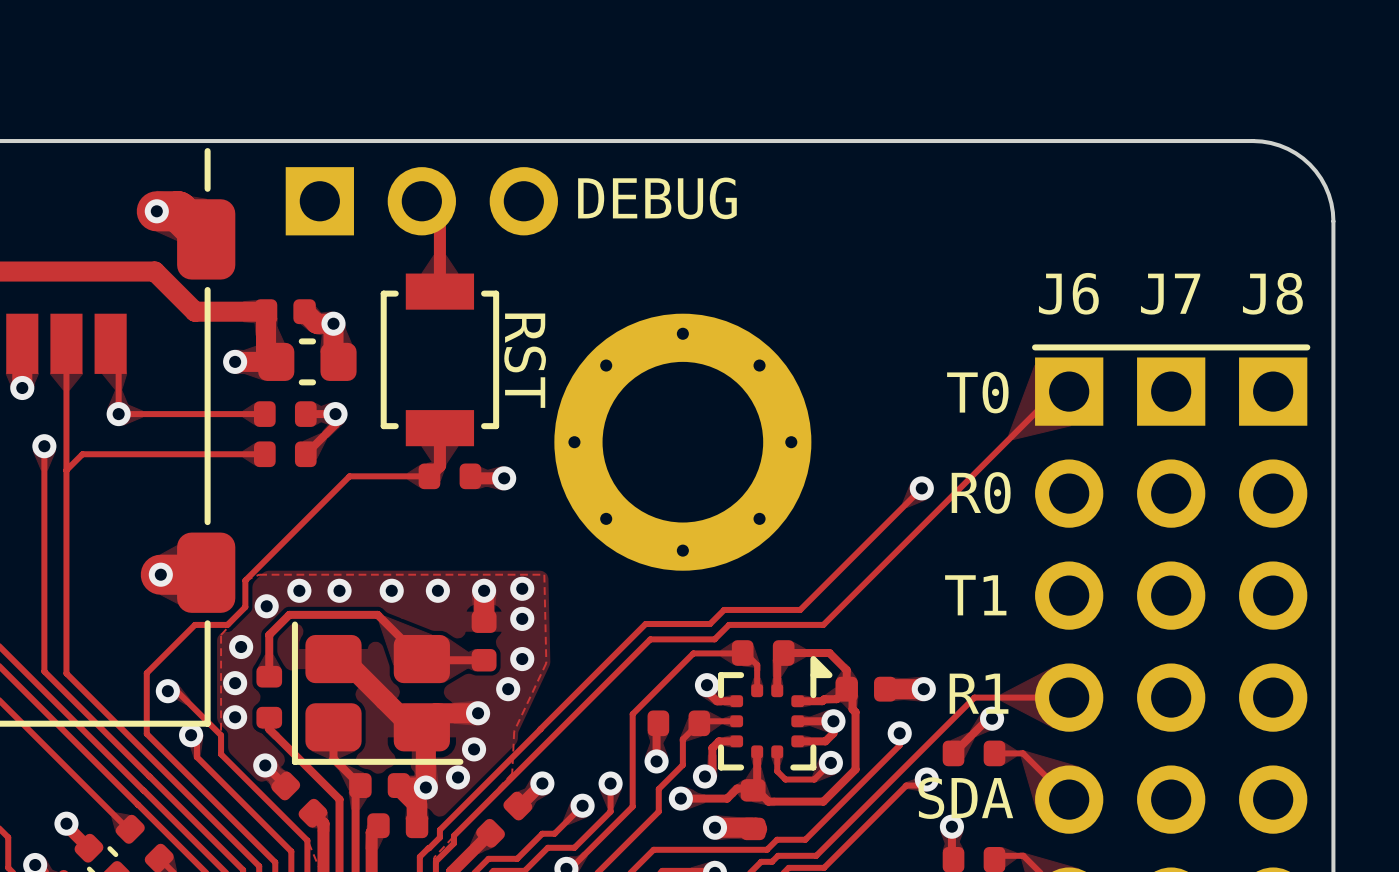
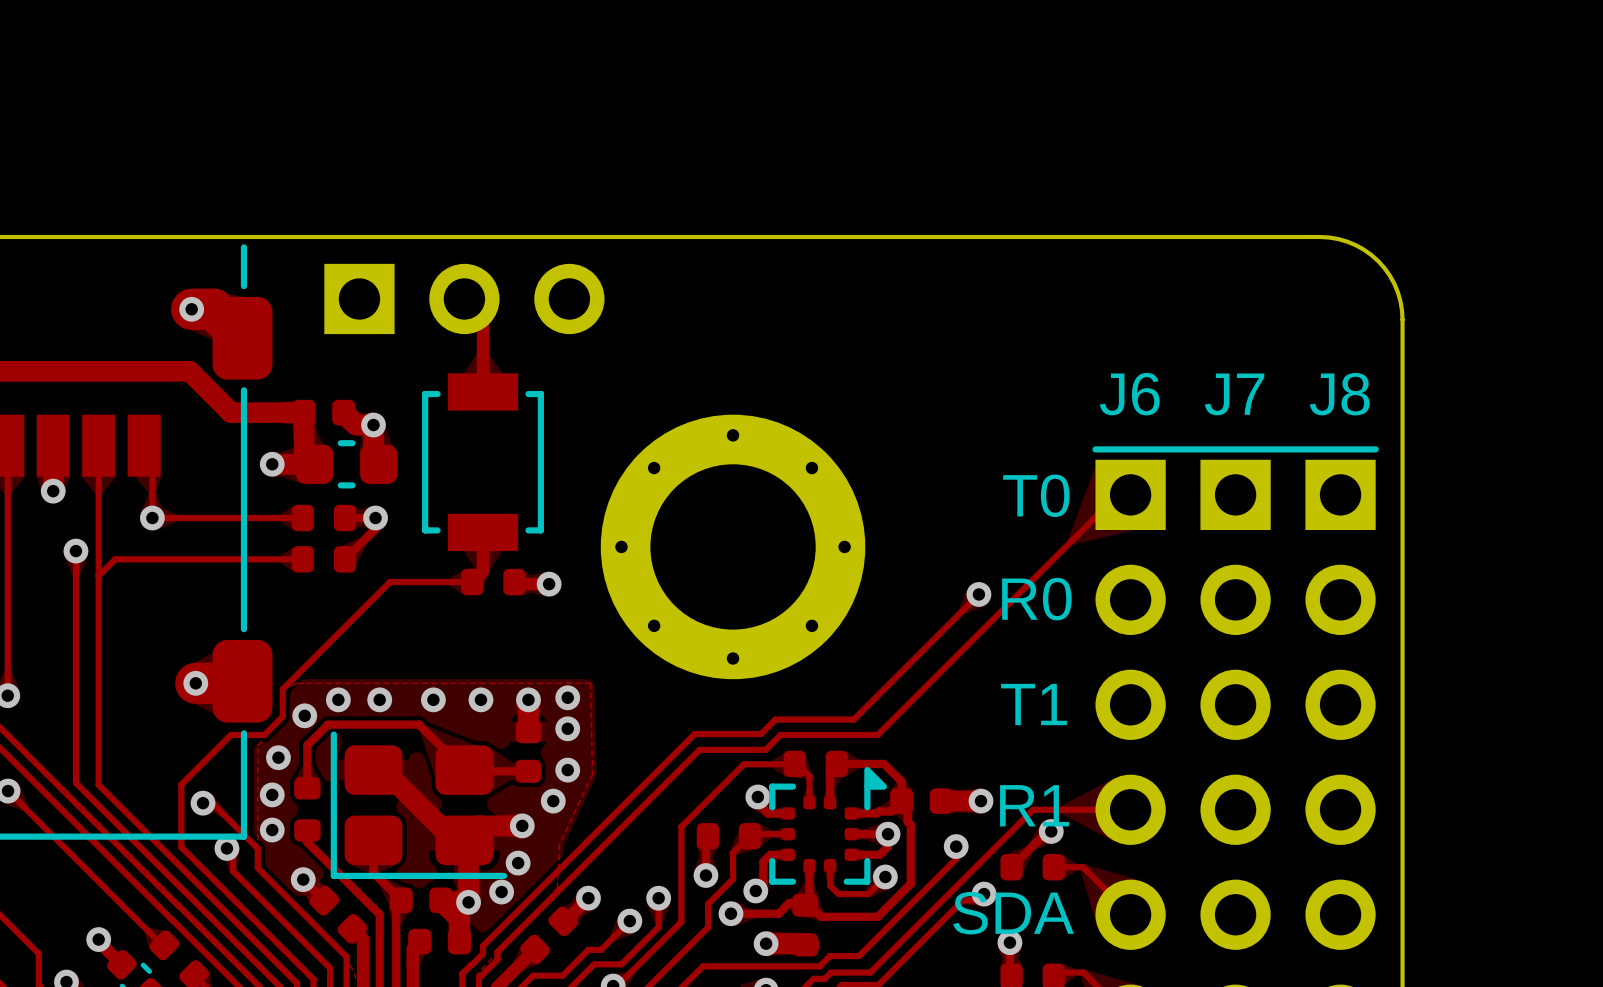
text: DEBUG (657, 198) -> none
text: RST (525, 360) -> none

